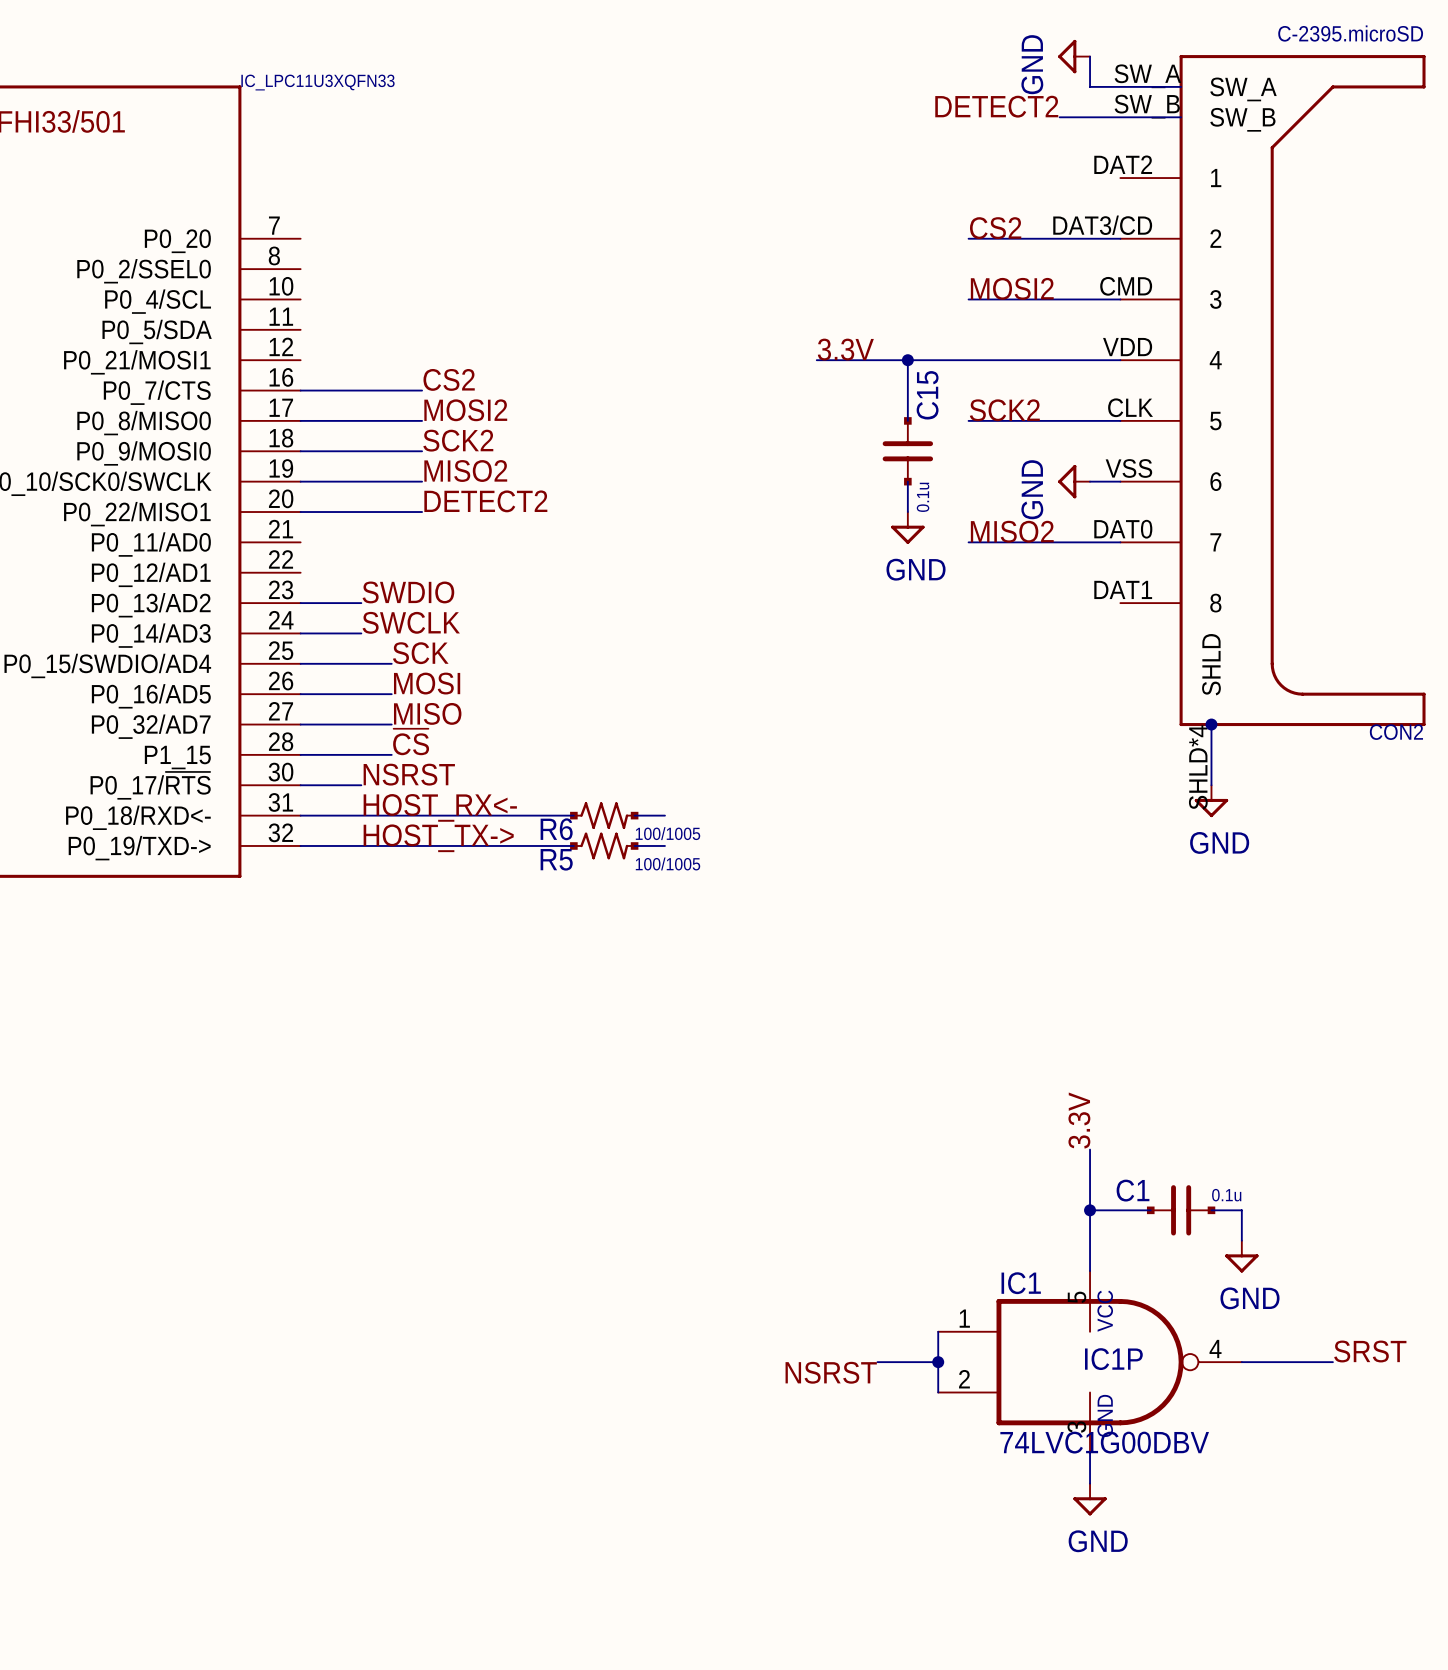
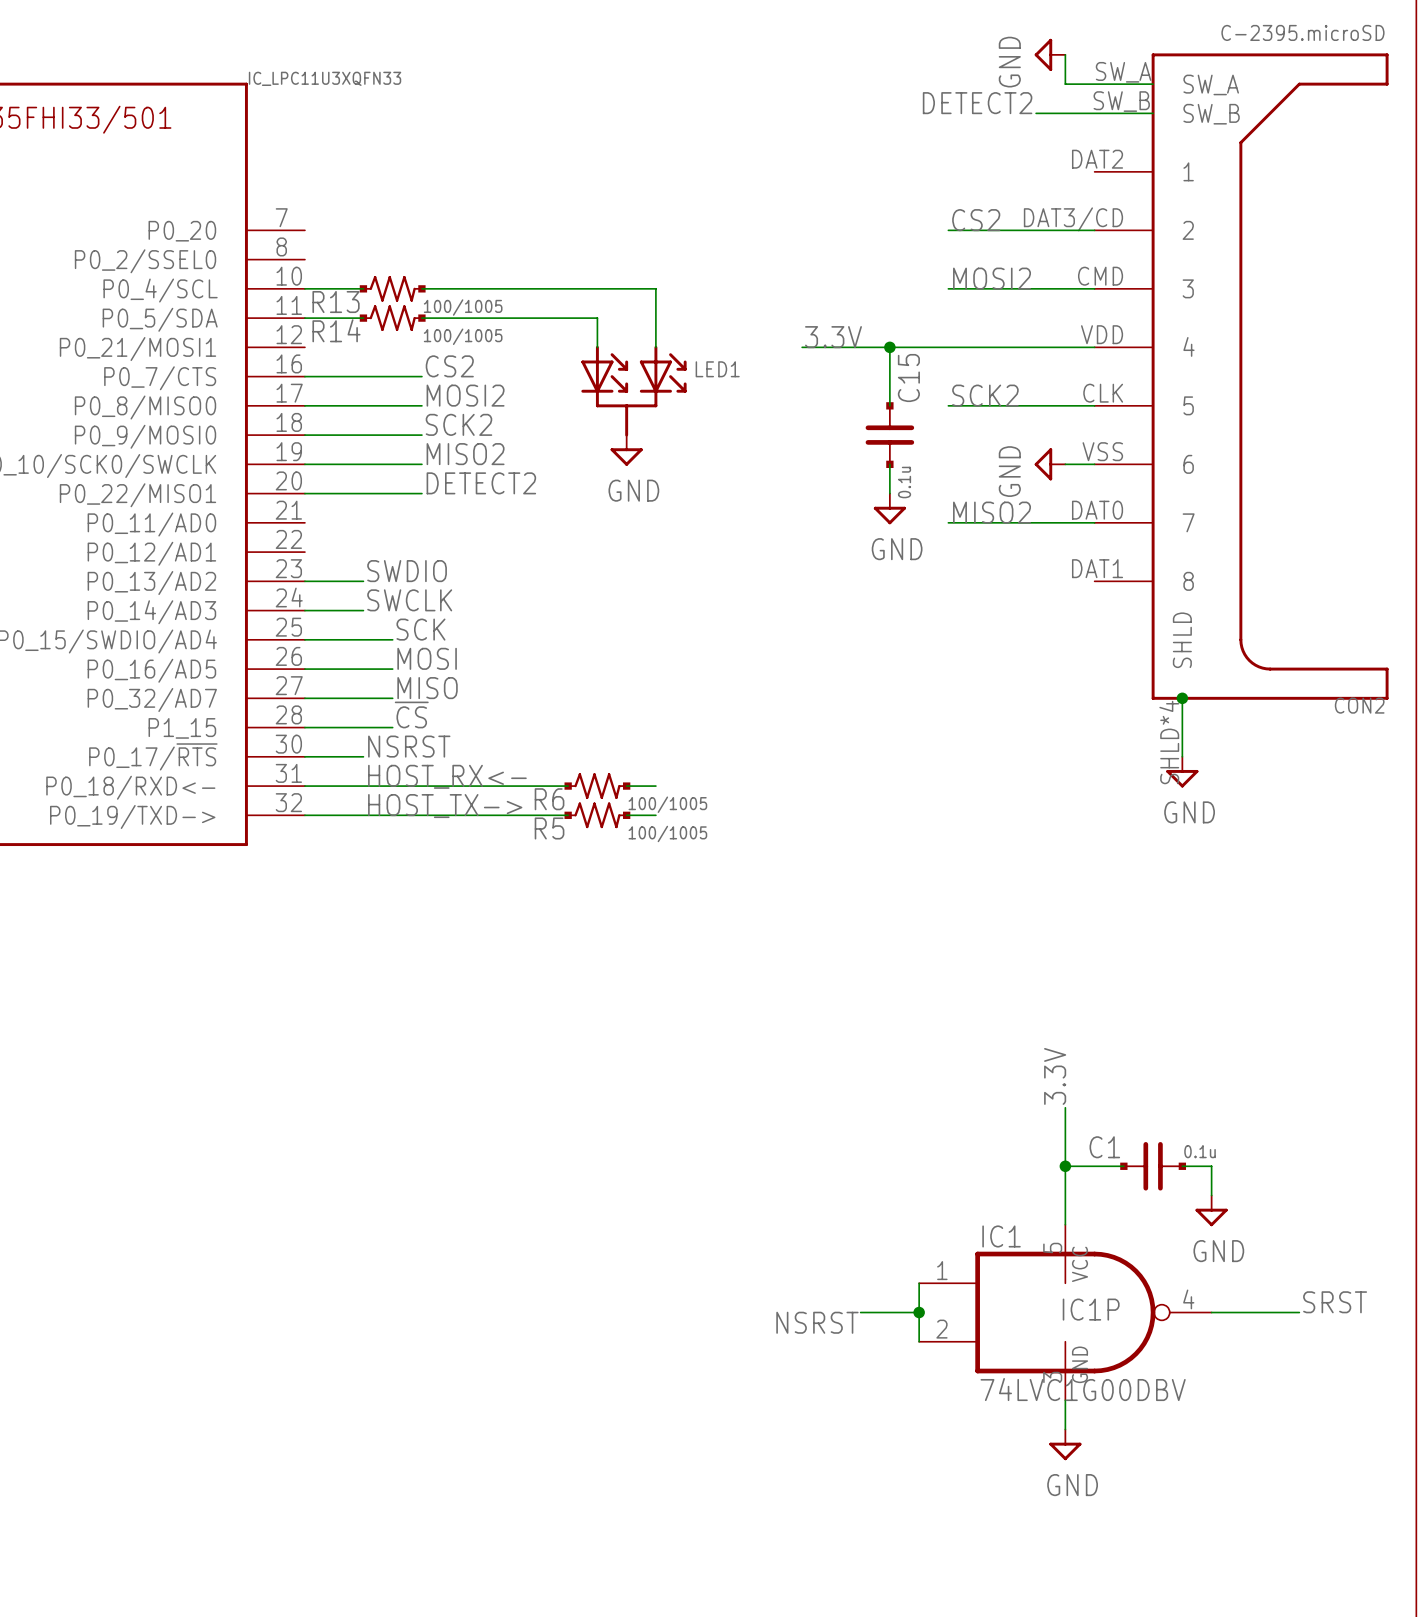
wire: none -> (304, 288) (363, 288)
R13: none -> 100/1005 (392, 288)
wire: none -> (421, 288) (655, 288) (655, 347)
wire: none -> (304, 318) (363, 318)
R14: none -> 100/1005 (392, 318)
wire: none -> (421, 318) (597, 318) (597, 347)
LED1: none -> (633, 391)
power symbol: none -> GND (626, 450)

